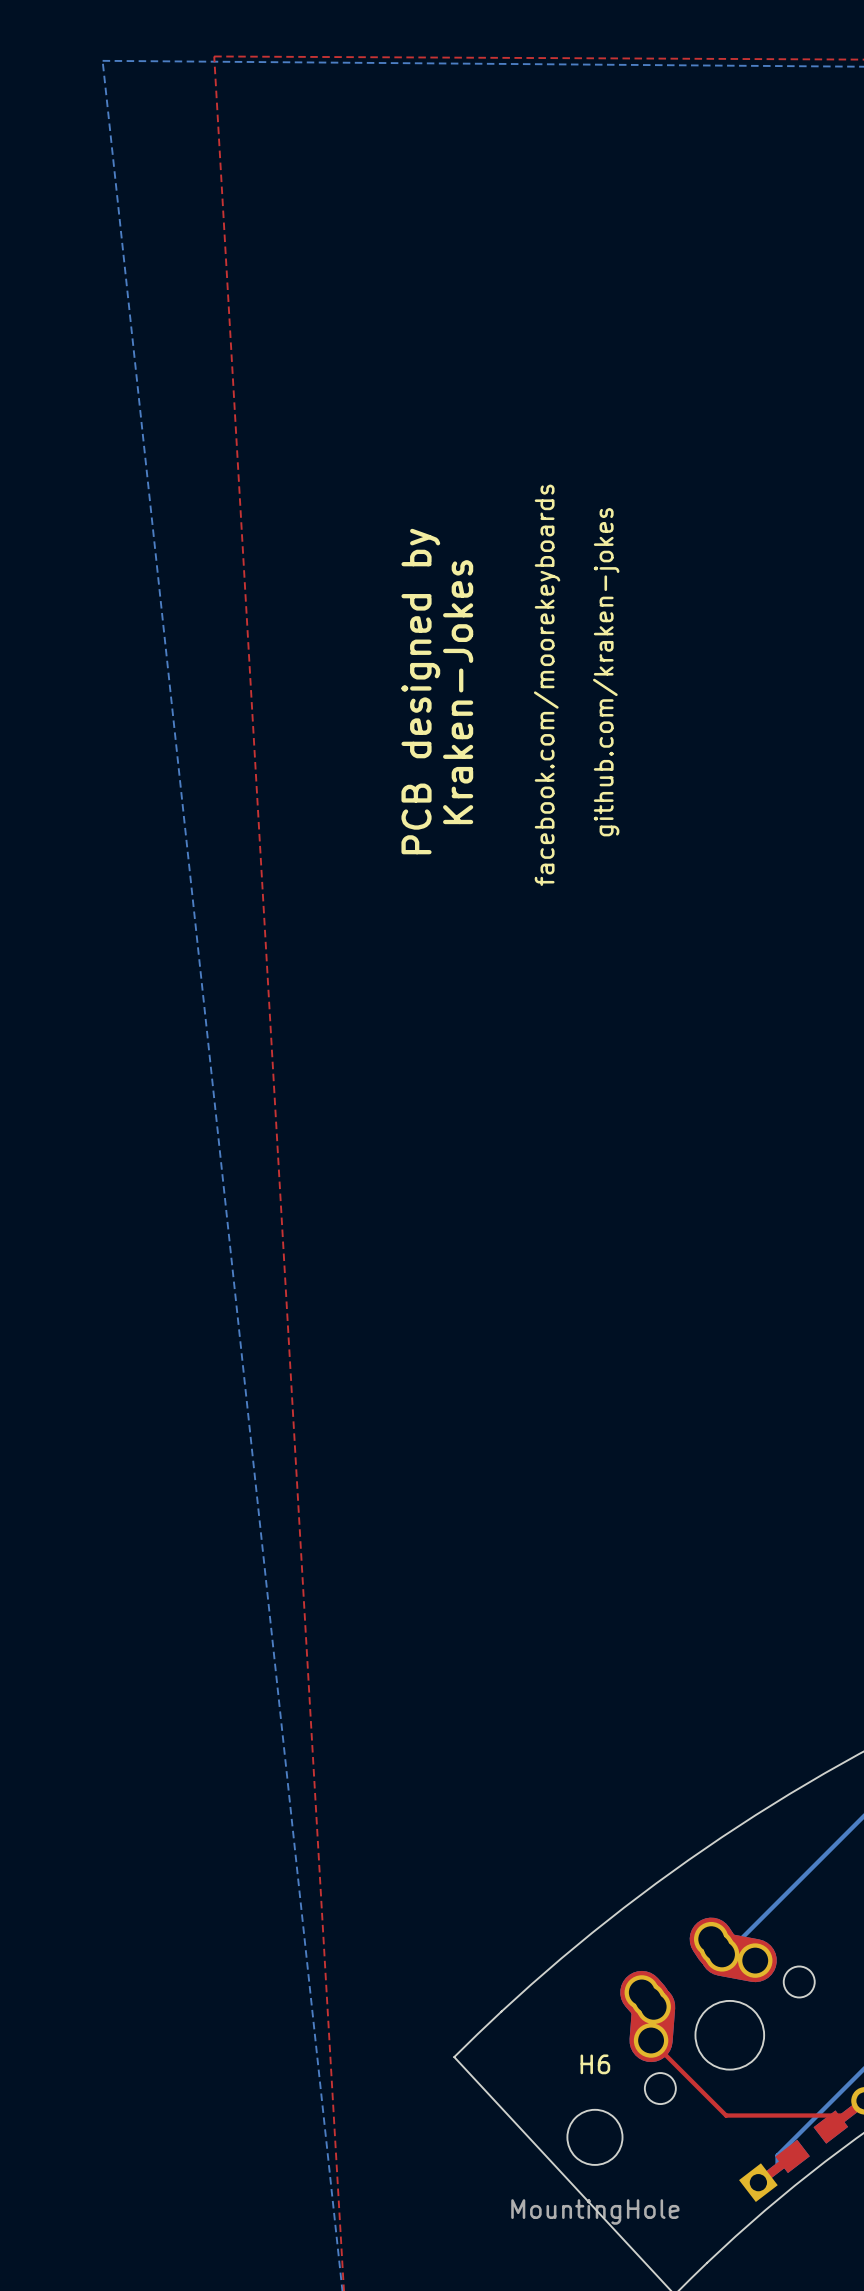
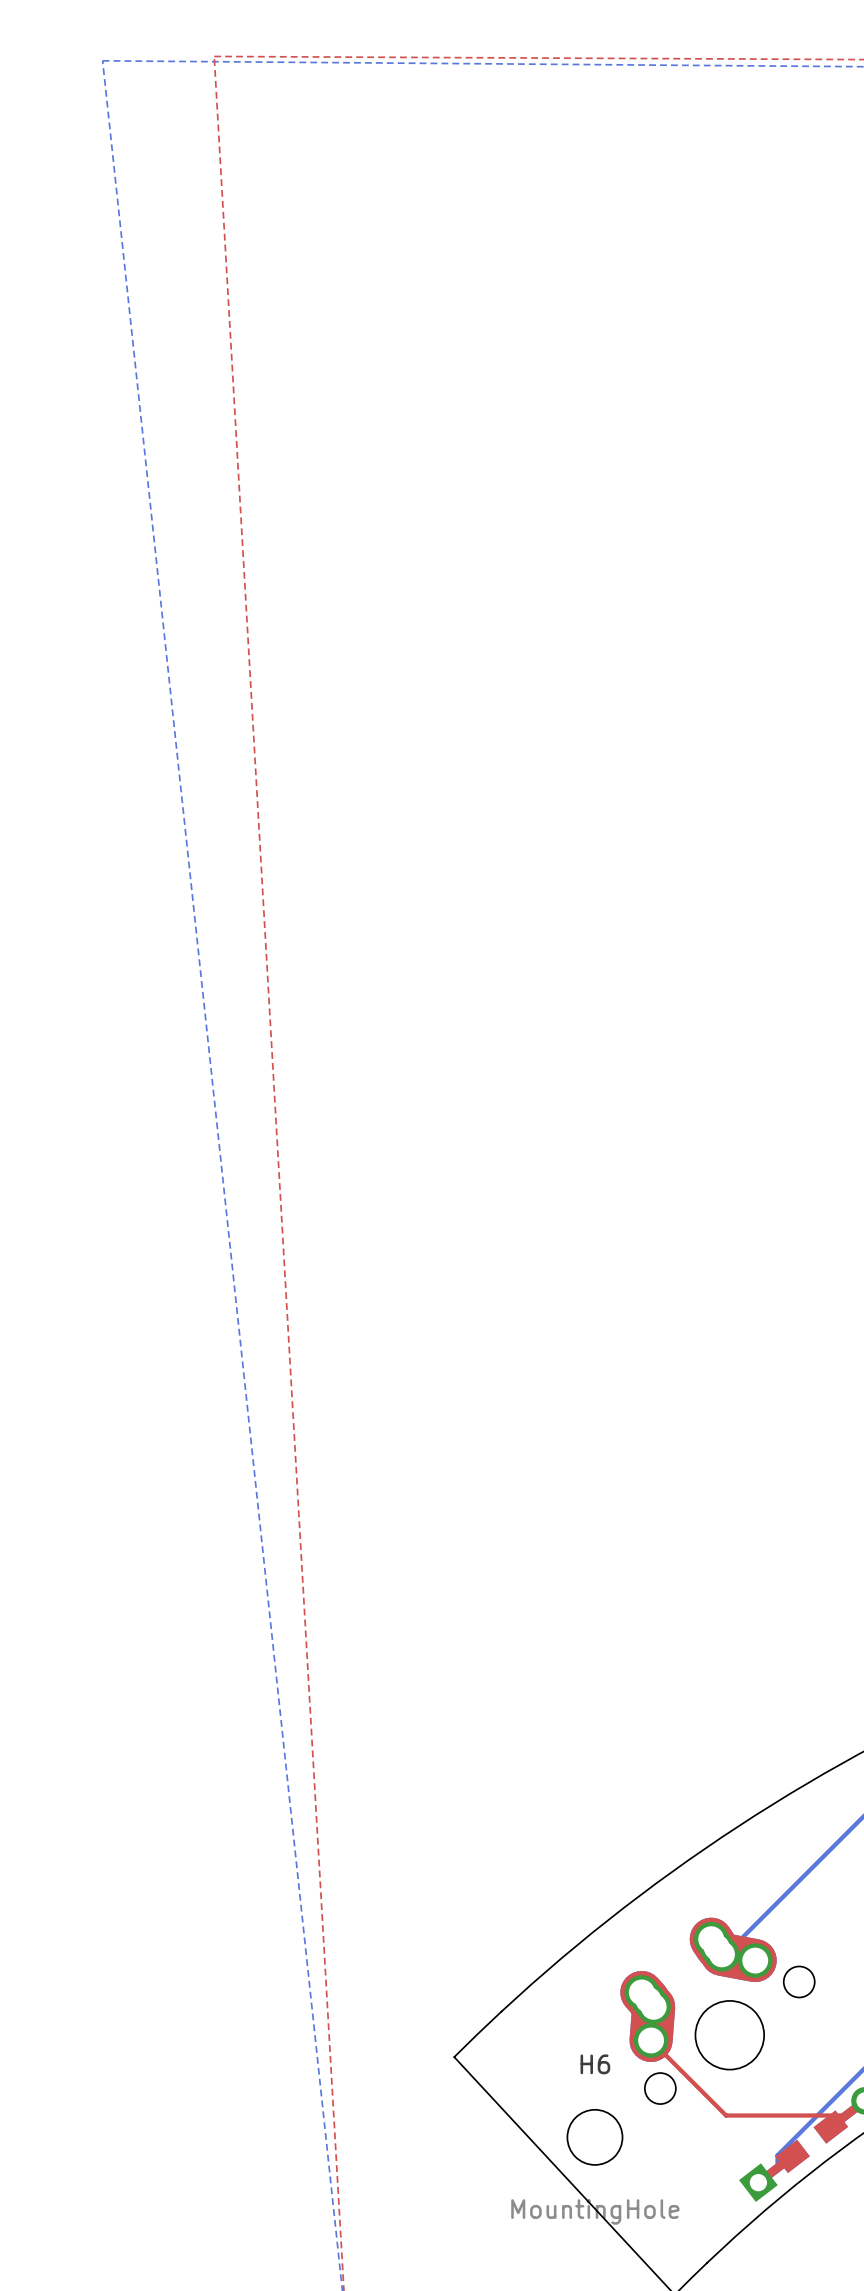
text: github.com/kraken-jokes (606, 672) -> none
text: facebook.com/moorekeyboards (547, 685) -> none
text: PCB designed by (420, 691) -> none
text: Kraken-Jokes (458, 692) -> none

